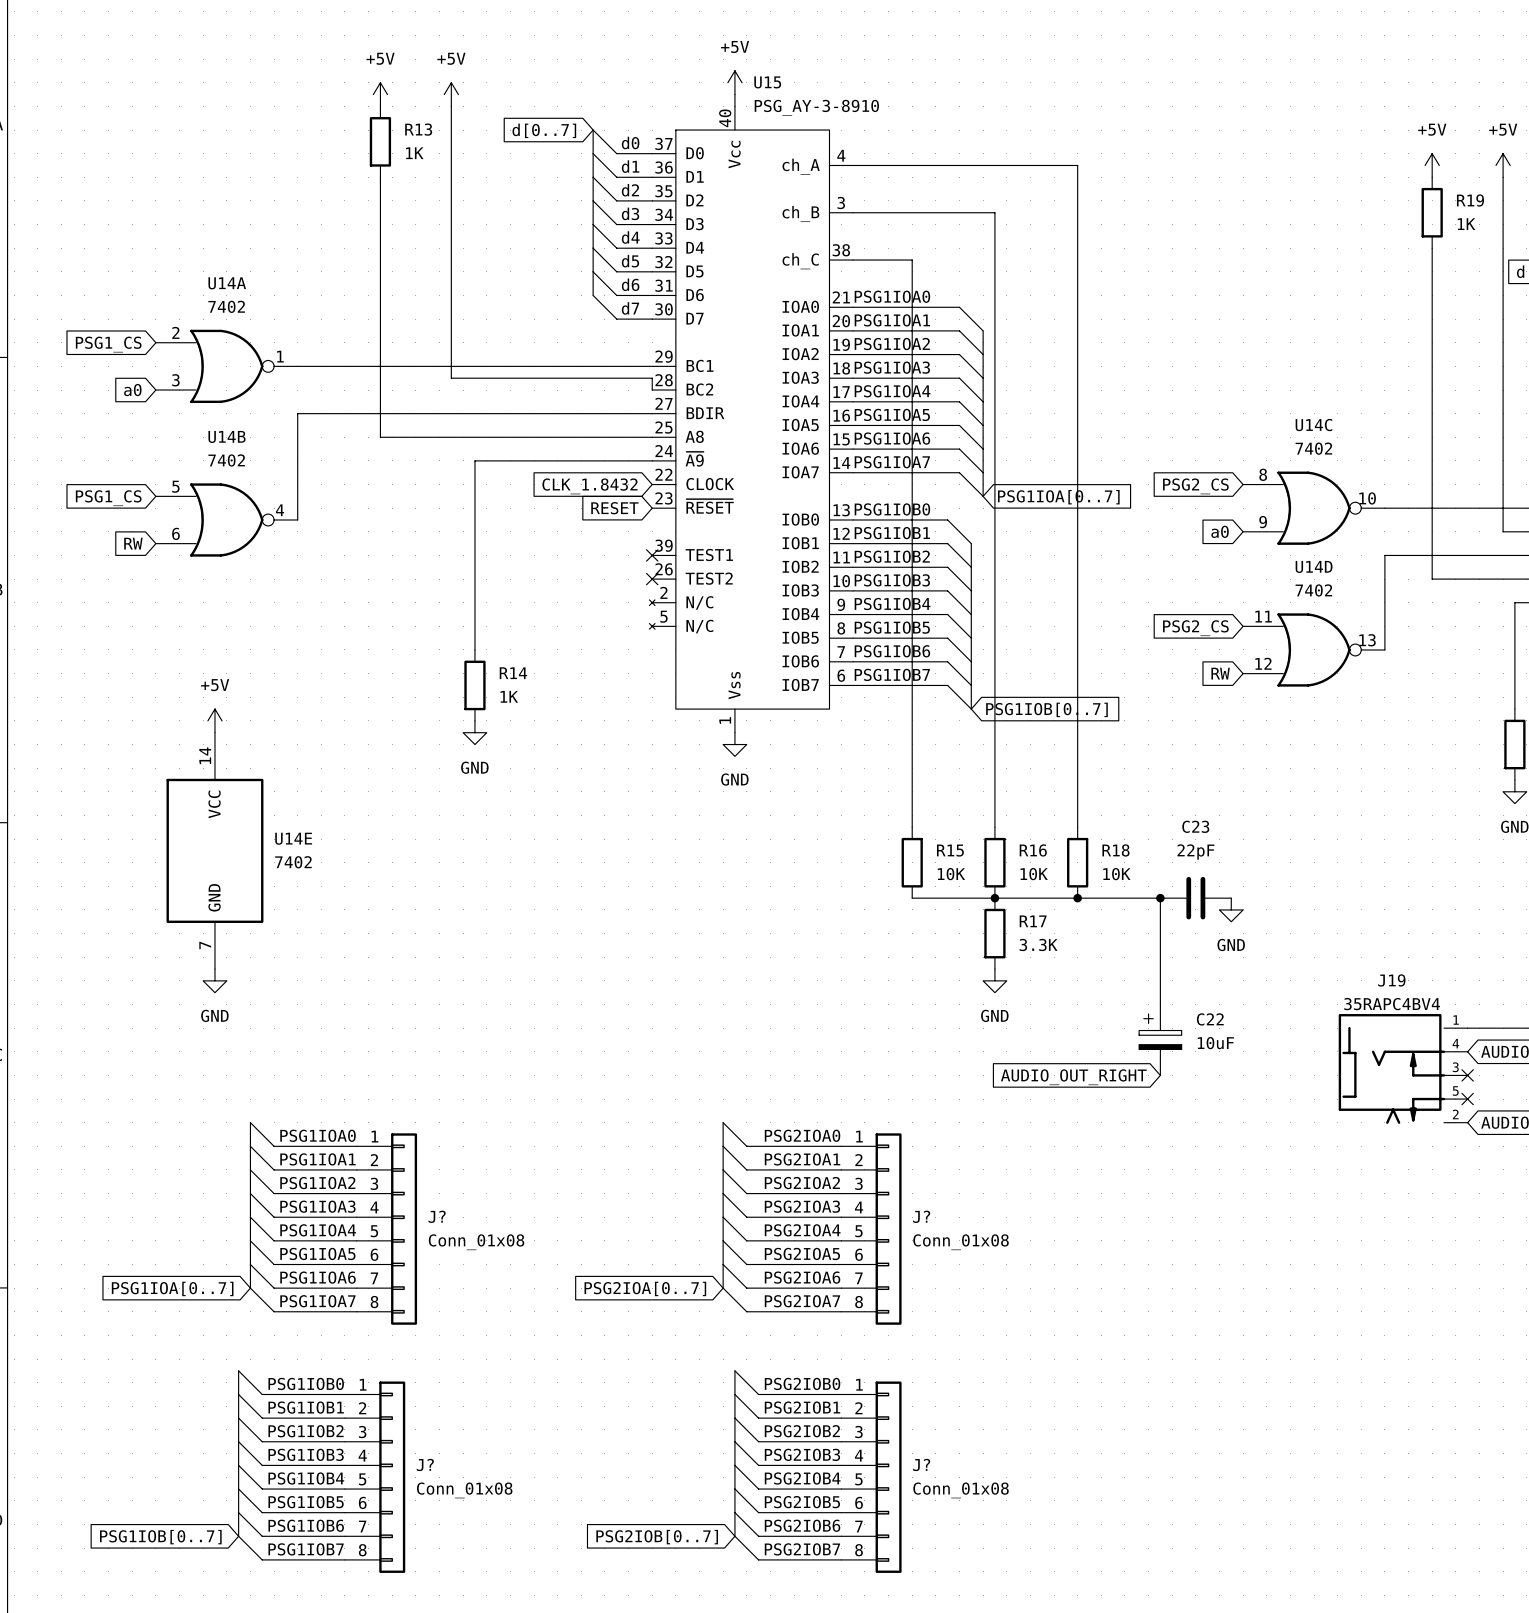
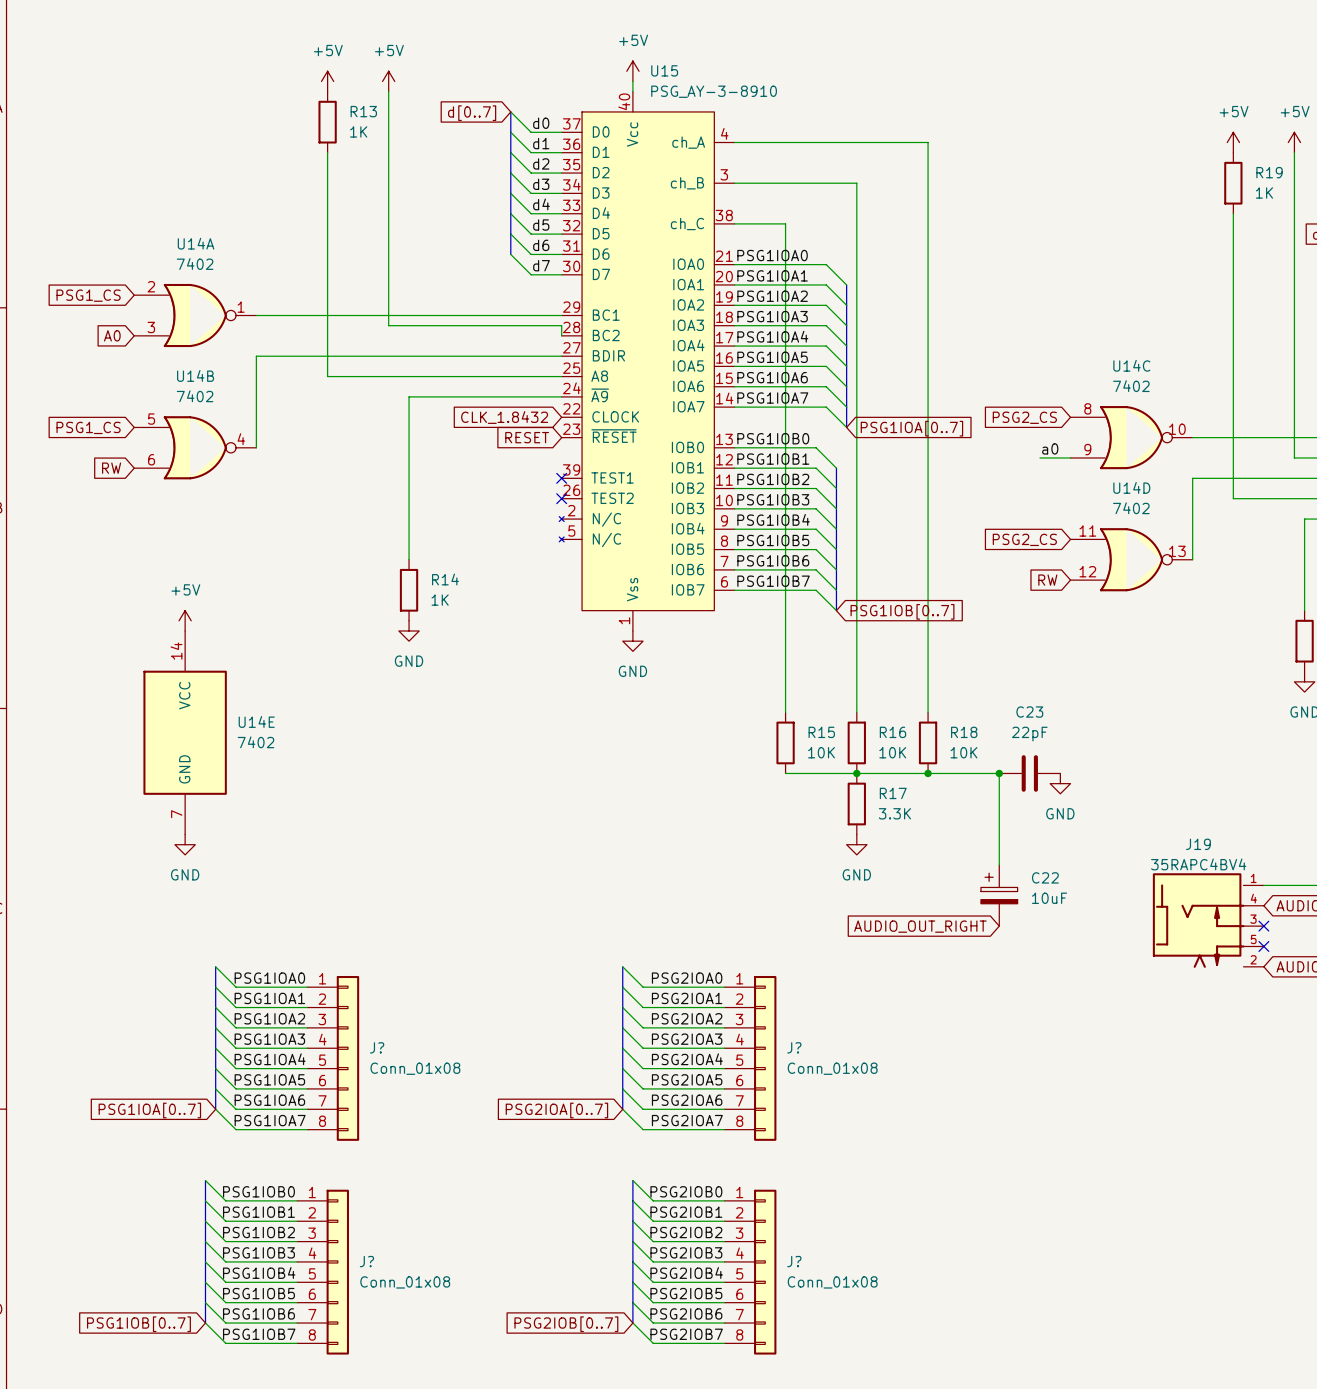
global label: a0 (132, 390) -> A0 (112, 335)
label: none -> a0 (1050, 448)
wire: none -> (1039, 457) (1070, 457)
global label: a0 (1220, 531) -> none

